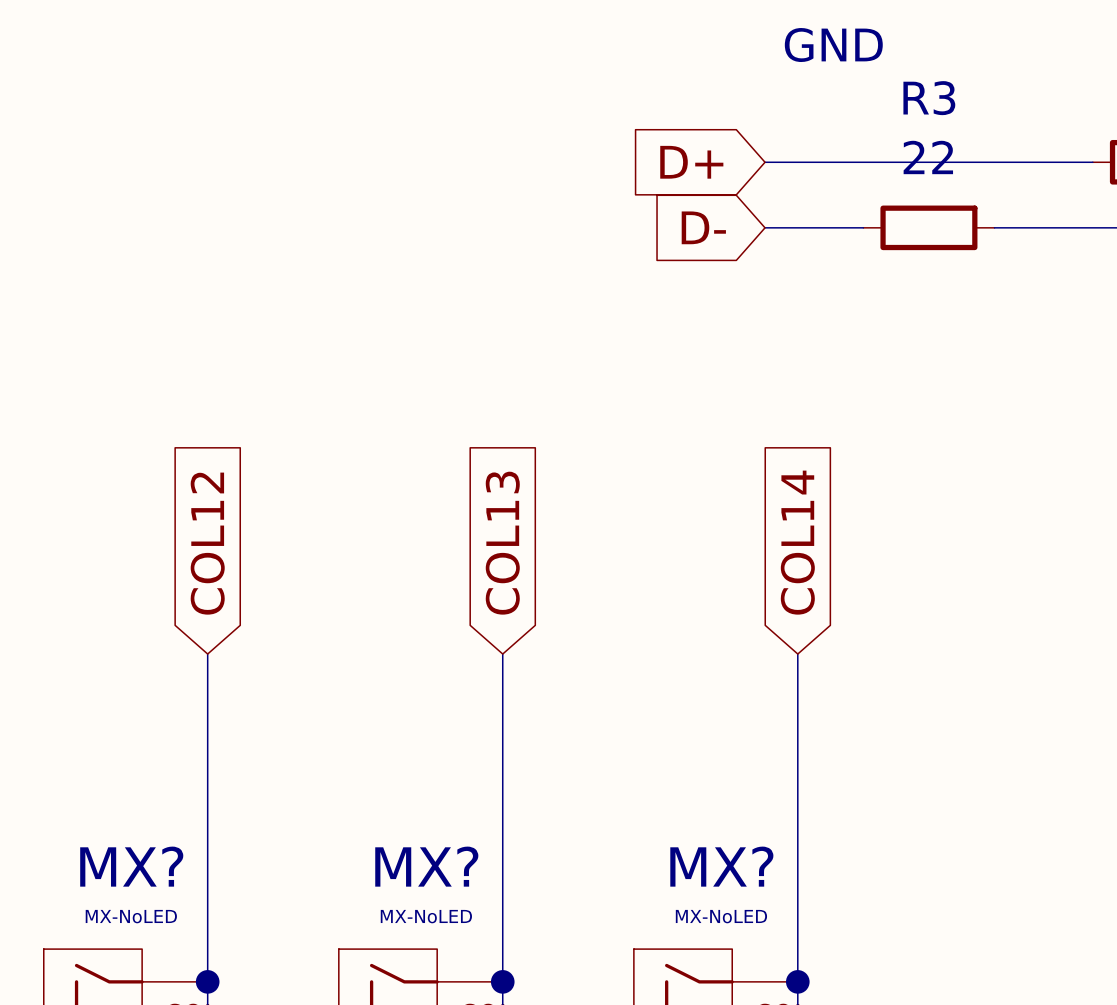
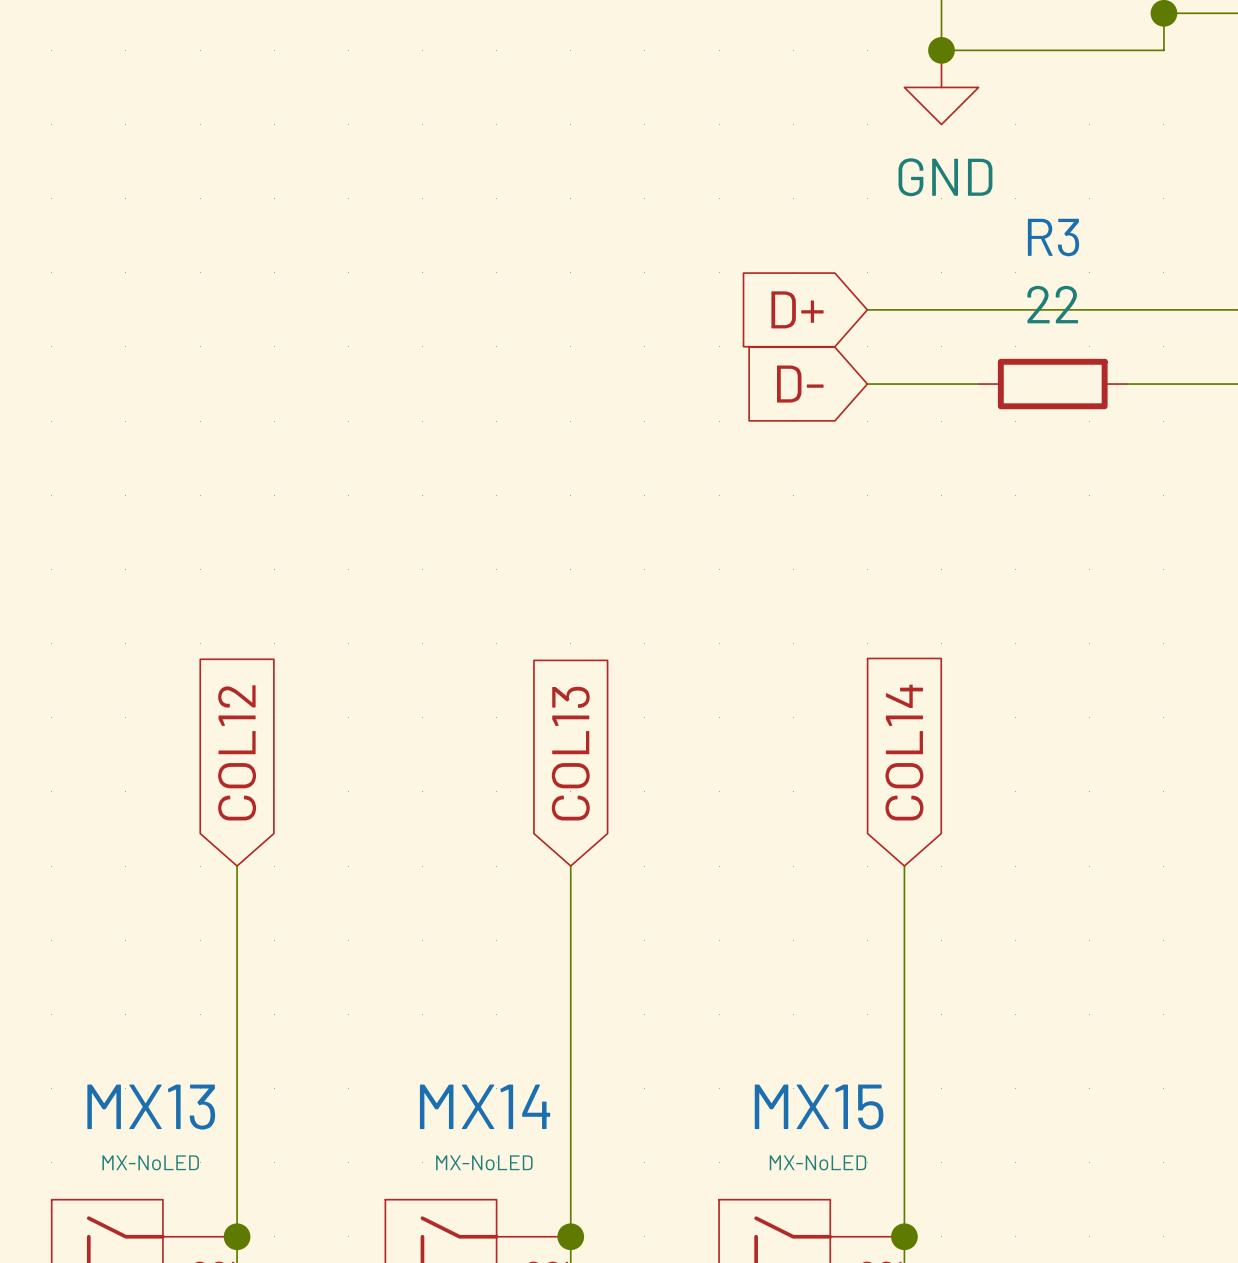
MX? name: MX? (131, 866) -> MX13 (151, 1107)
MX? name: MX? (426, 866) -> MX14 (485, 1106)
MX? name: MX? (721, 866) -> MX15 (819, 1107)

